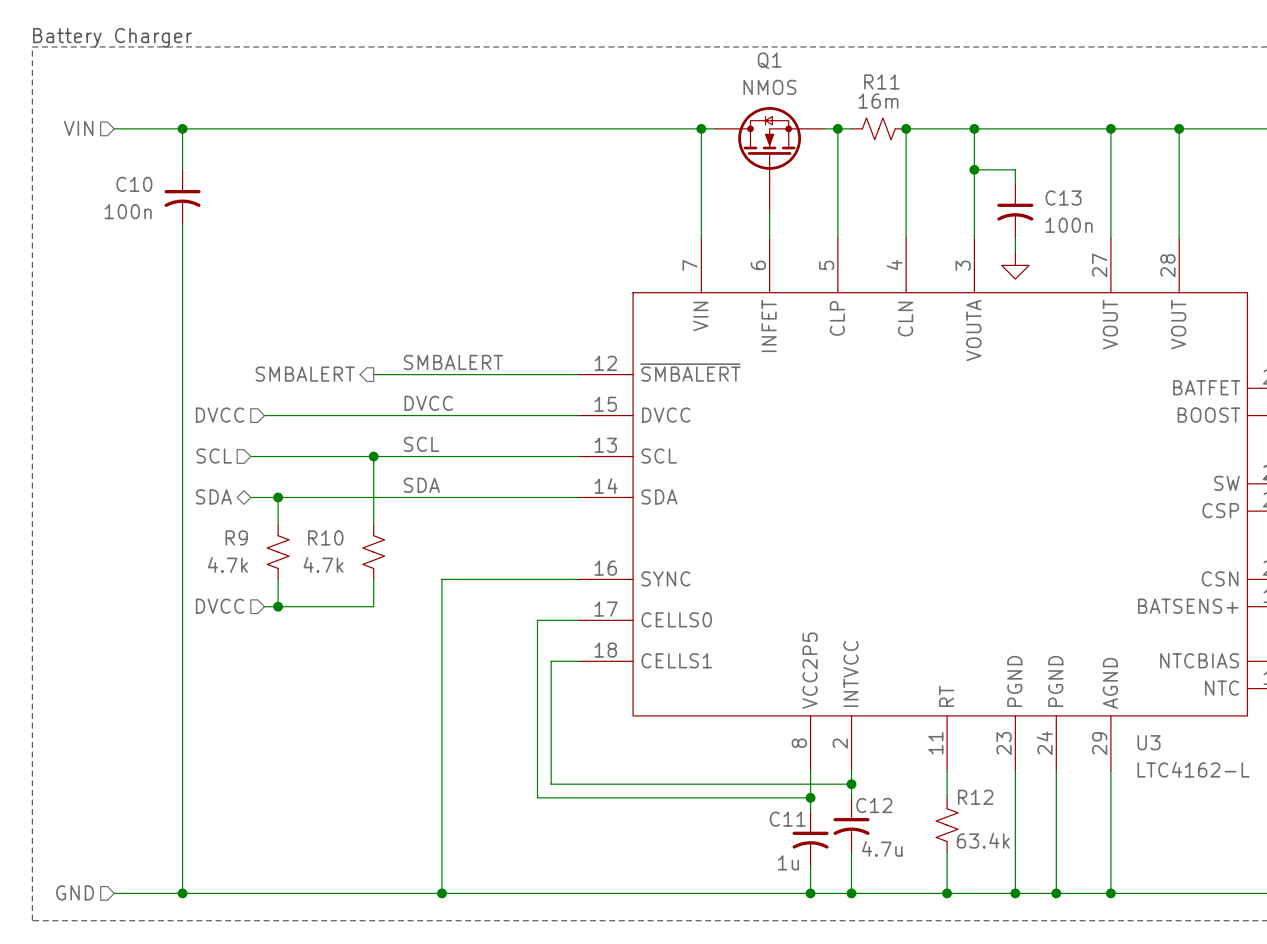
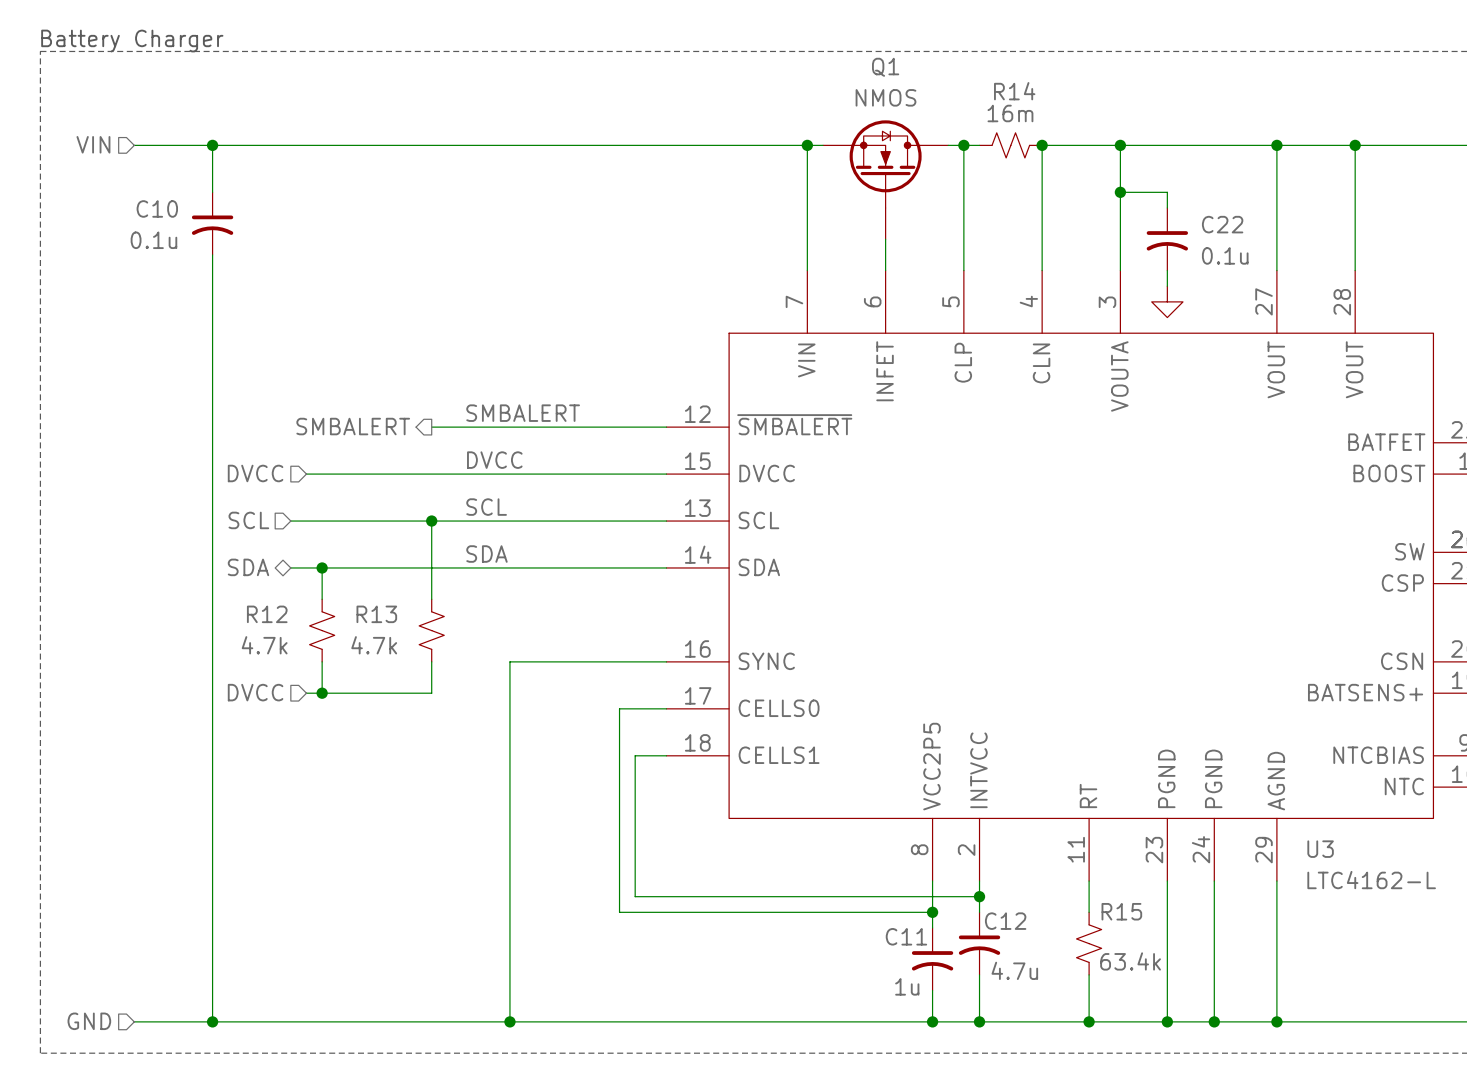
R11 name: R11 (881, 81) -> R14 (1014, 91)
Q1 flip: as is (769, 145) -> left-right (885, 164)
C13 name: C13 (1063, 197) -> C22 (1222, 224)
C10 value: 100n (128, 211) -> 0.1u (153, 240)
C13 value: 100n (1069, 225) -> 0.1u (1225, 255)
R9 name: R9 (236, 537) -> R12 (267, 614)
R10 name: R10 (325, 537) -> R13 (376, 614)
R12 name: R12 (975, 797) -> R15 (1121, 911)

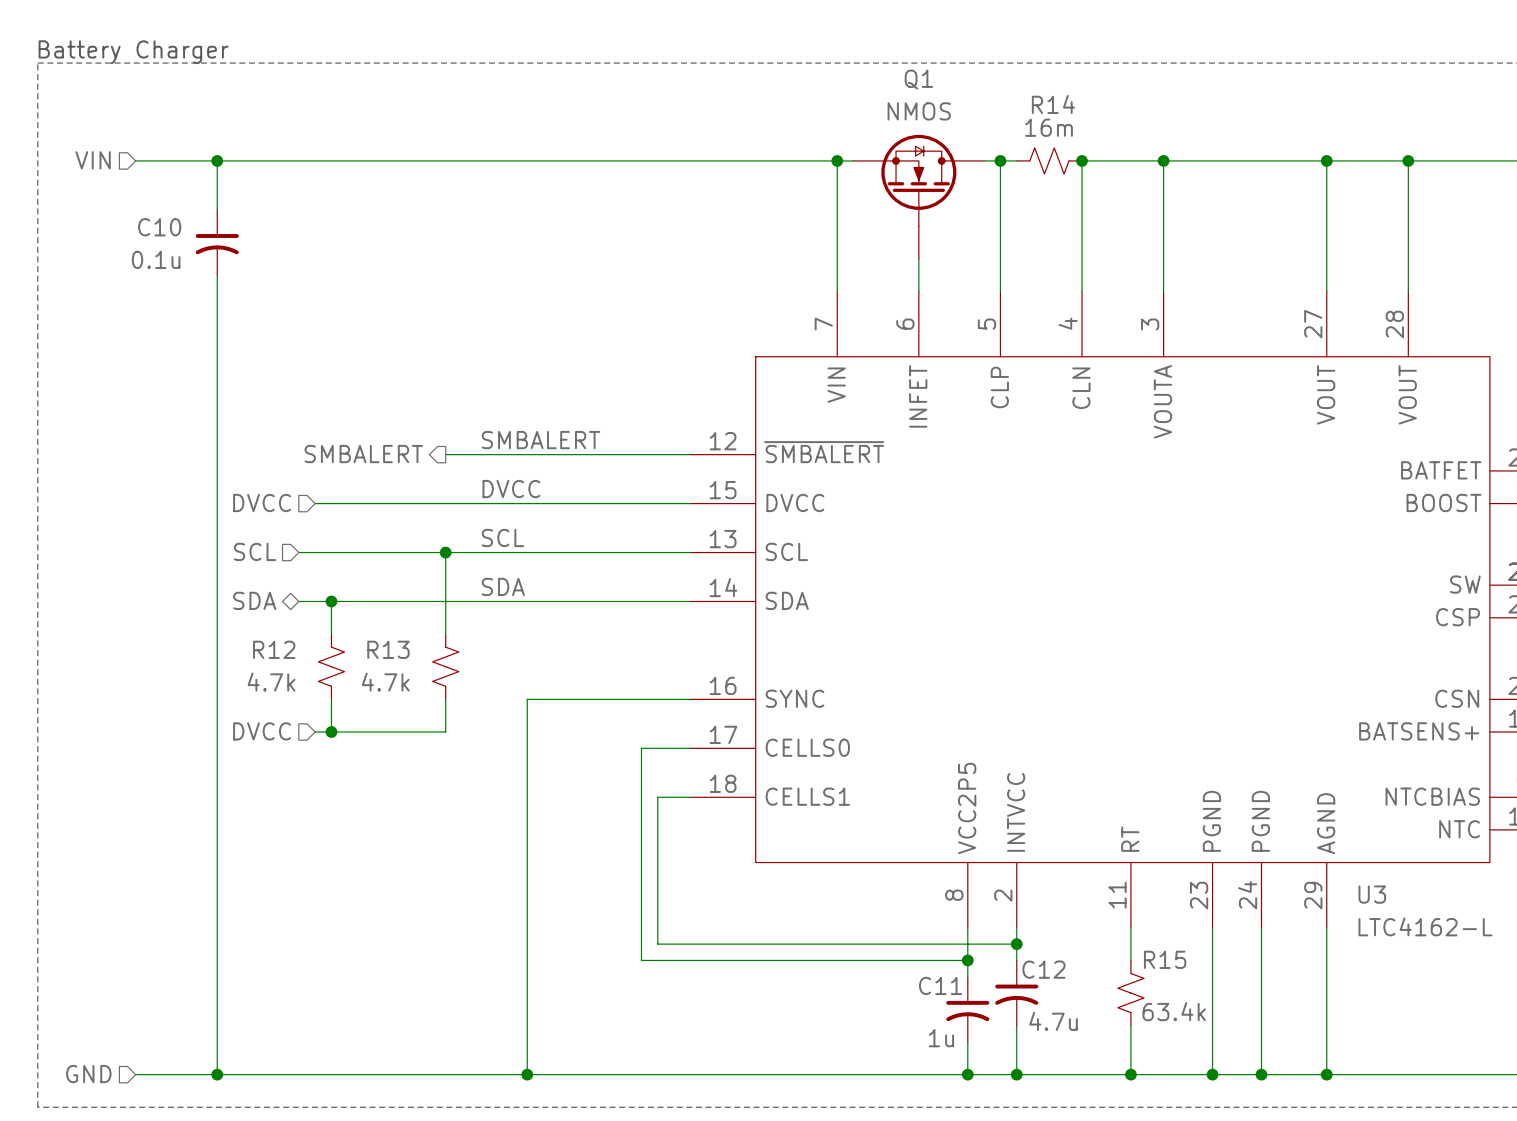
wire: (1120, 192) (1167, 192) (1167, 207) -> none
junction: (1120, 192) -> none
C22: 0.1u (1167, 239) -> none
wire: (1167, 270) (1167, 286) -> none
power symbol: (1167, 301) -> none

